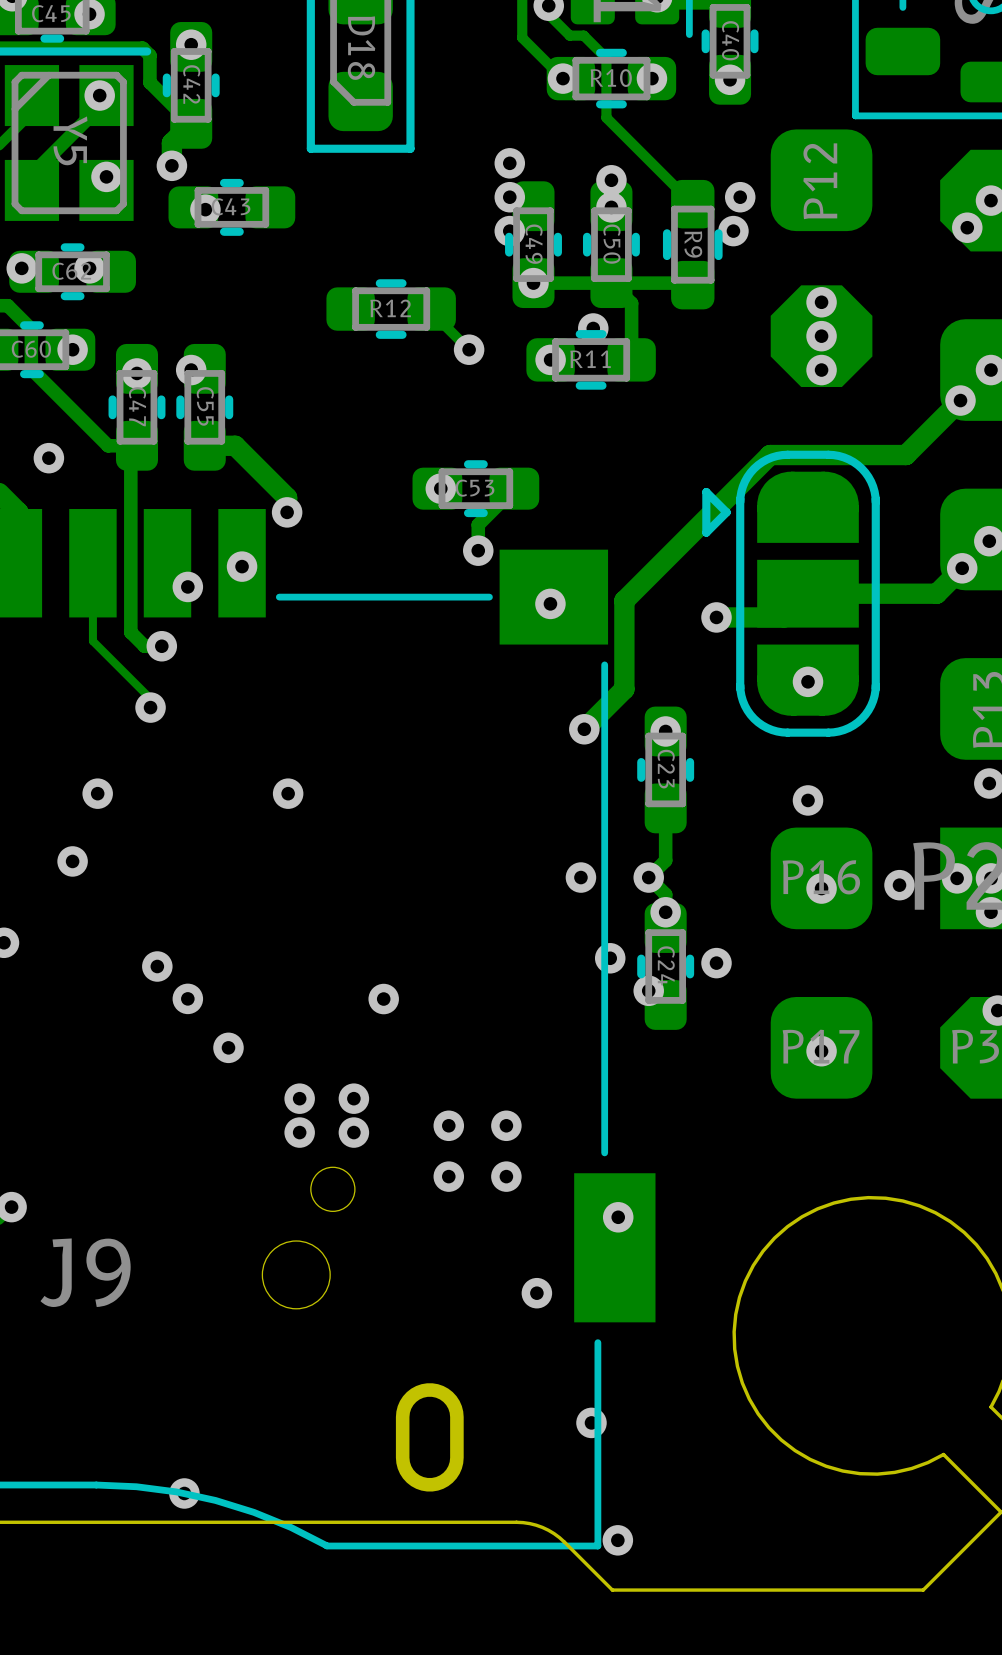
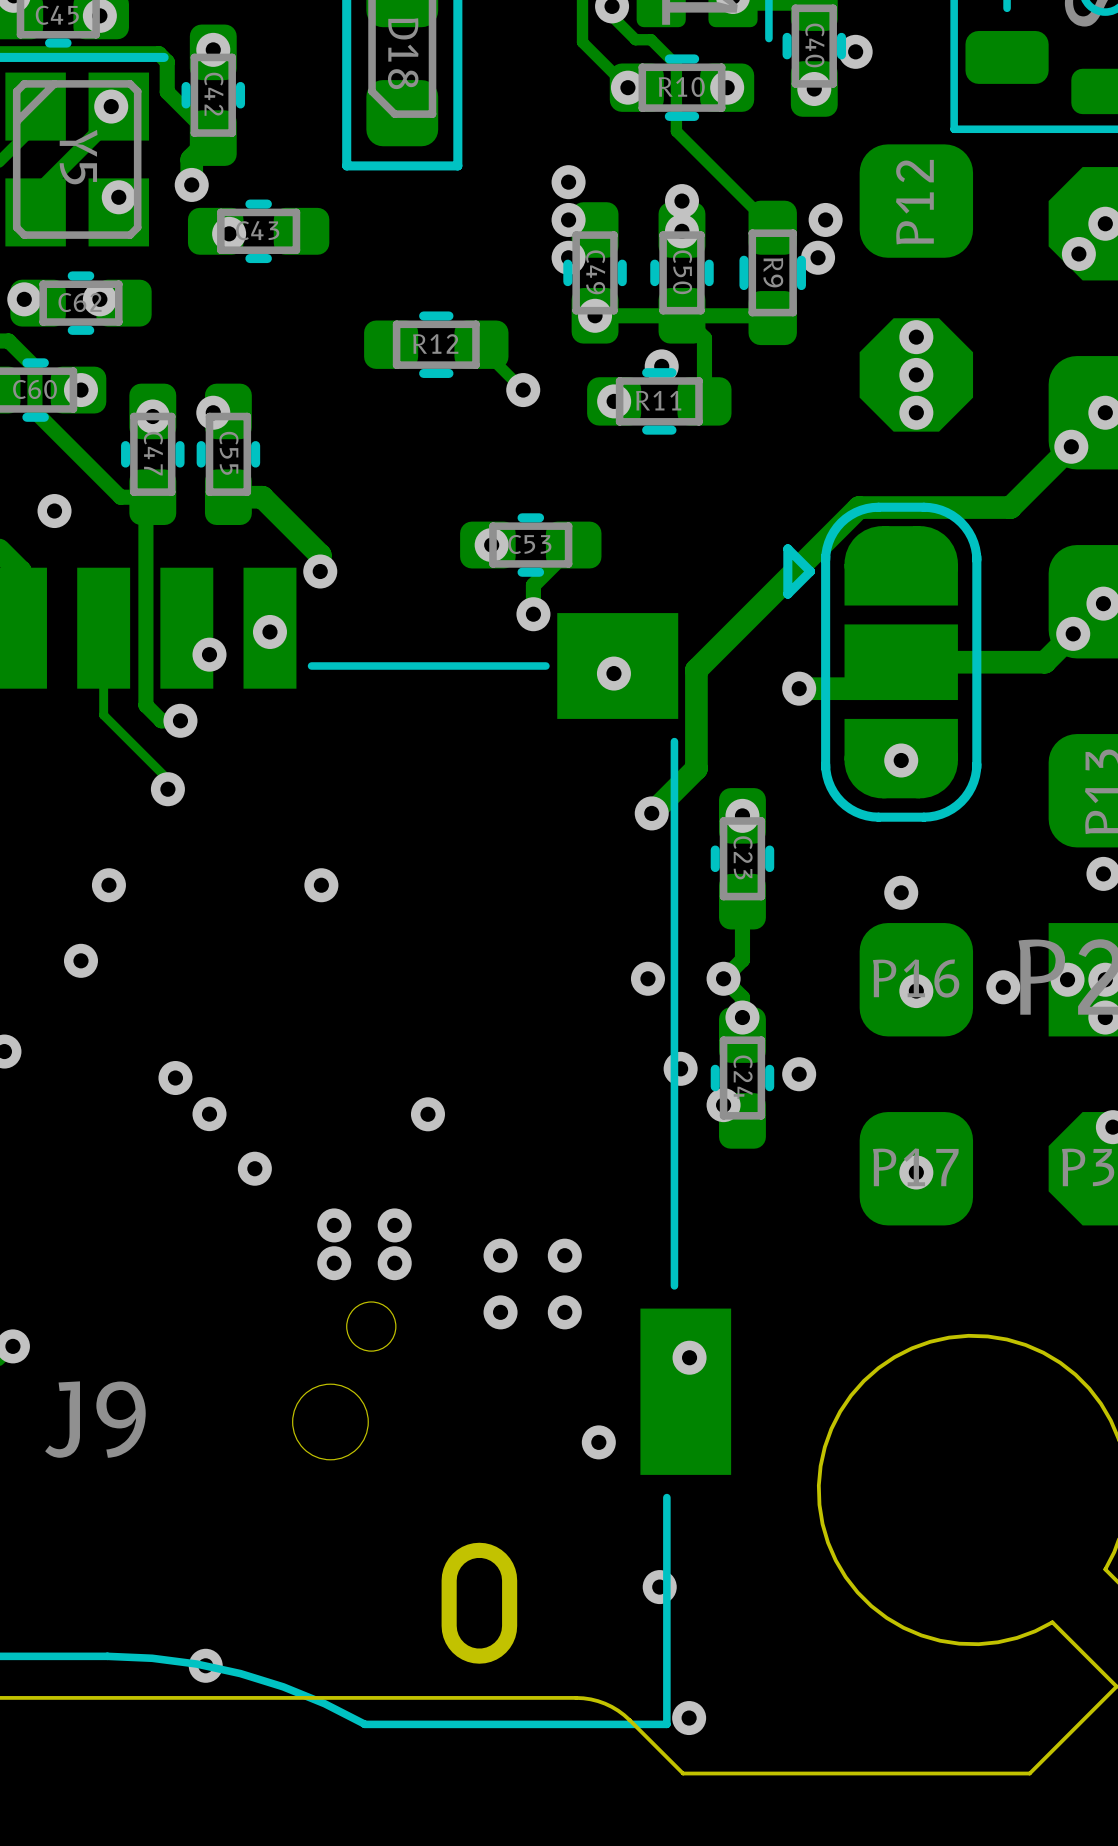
via: none -> (855, 51)

